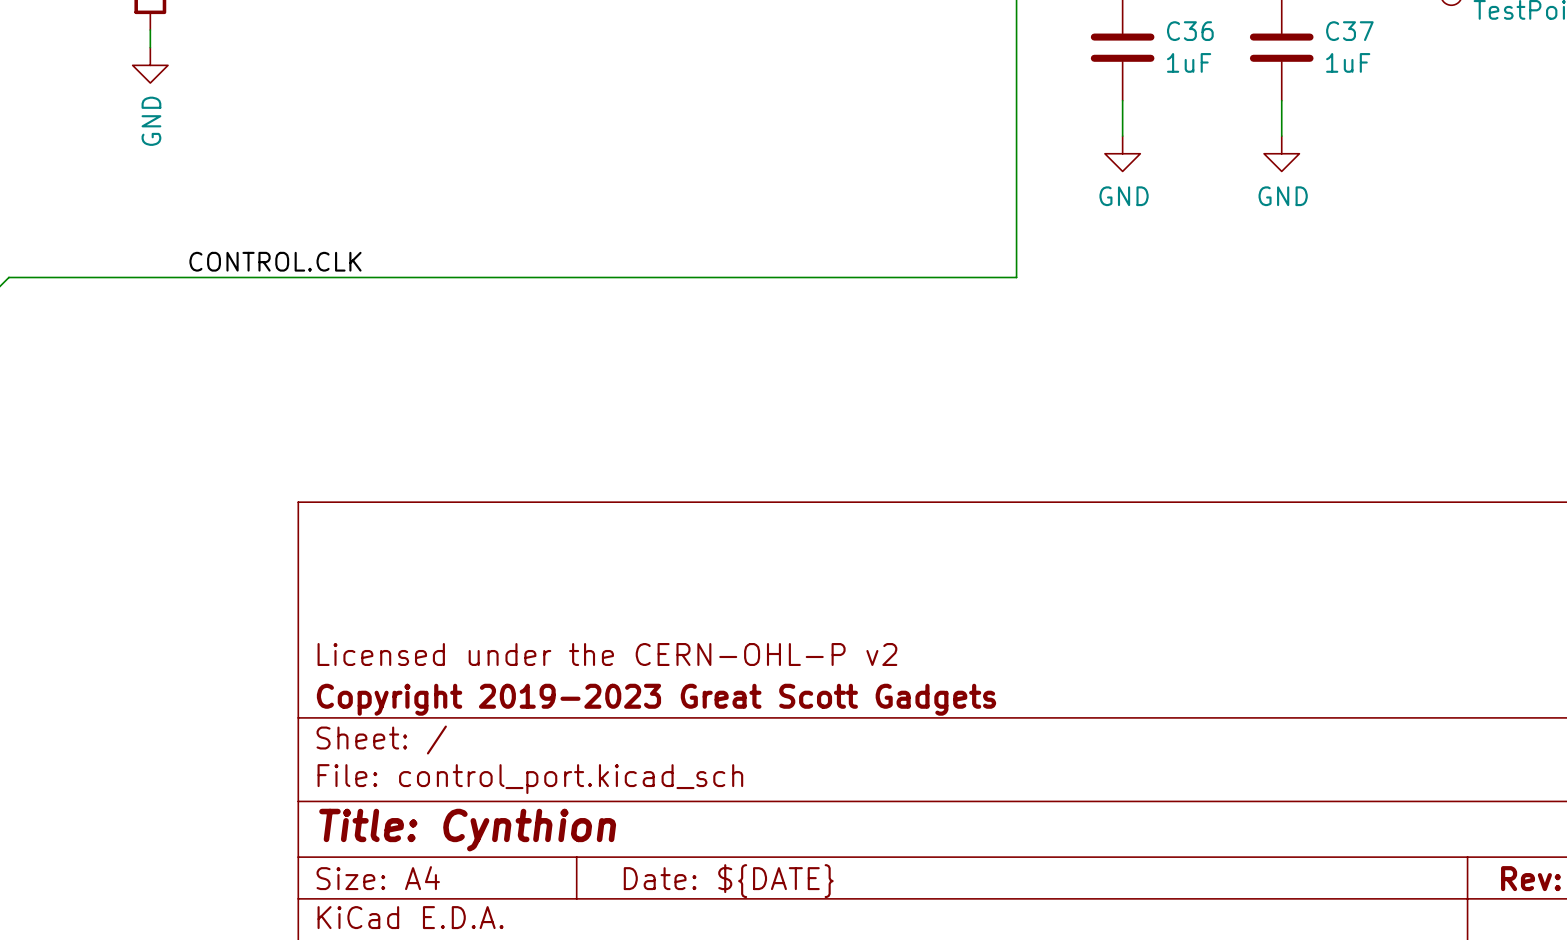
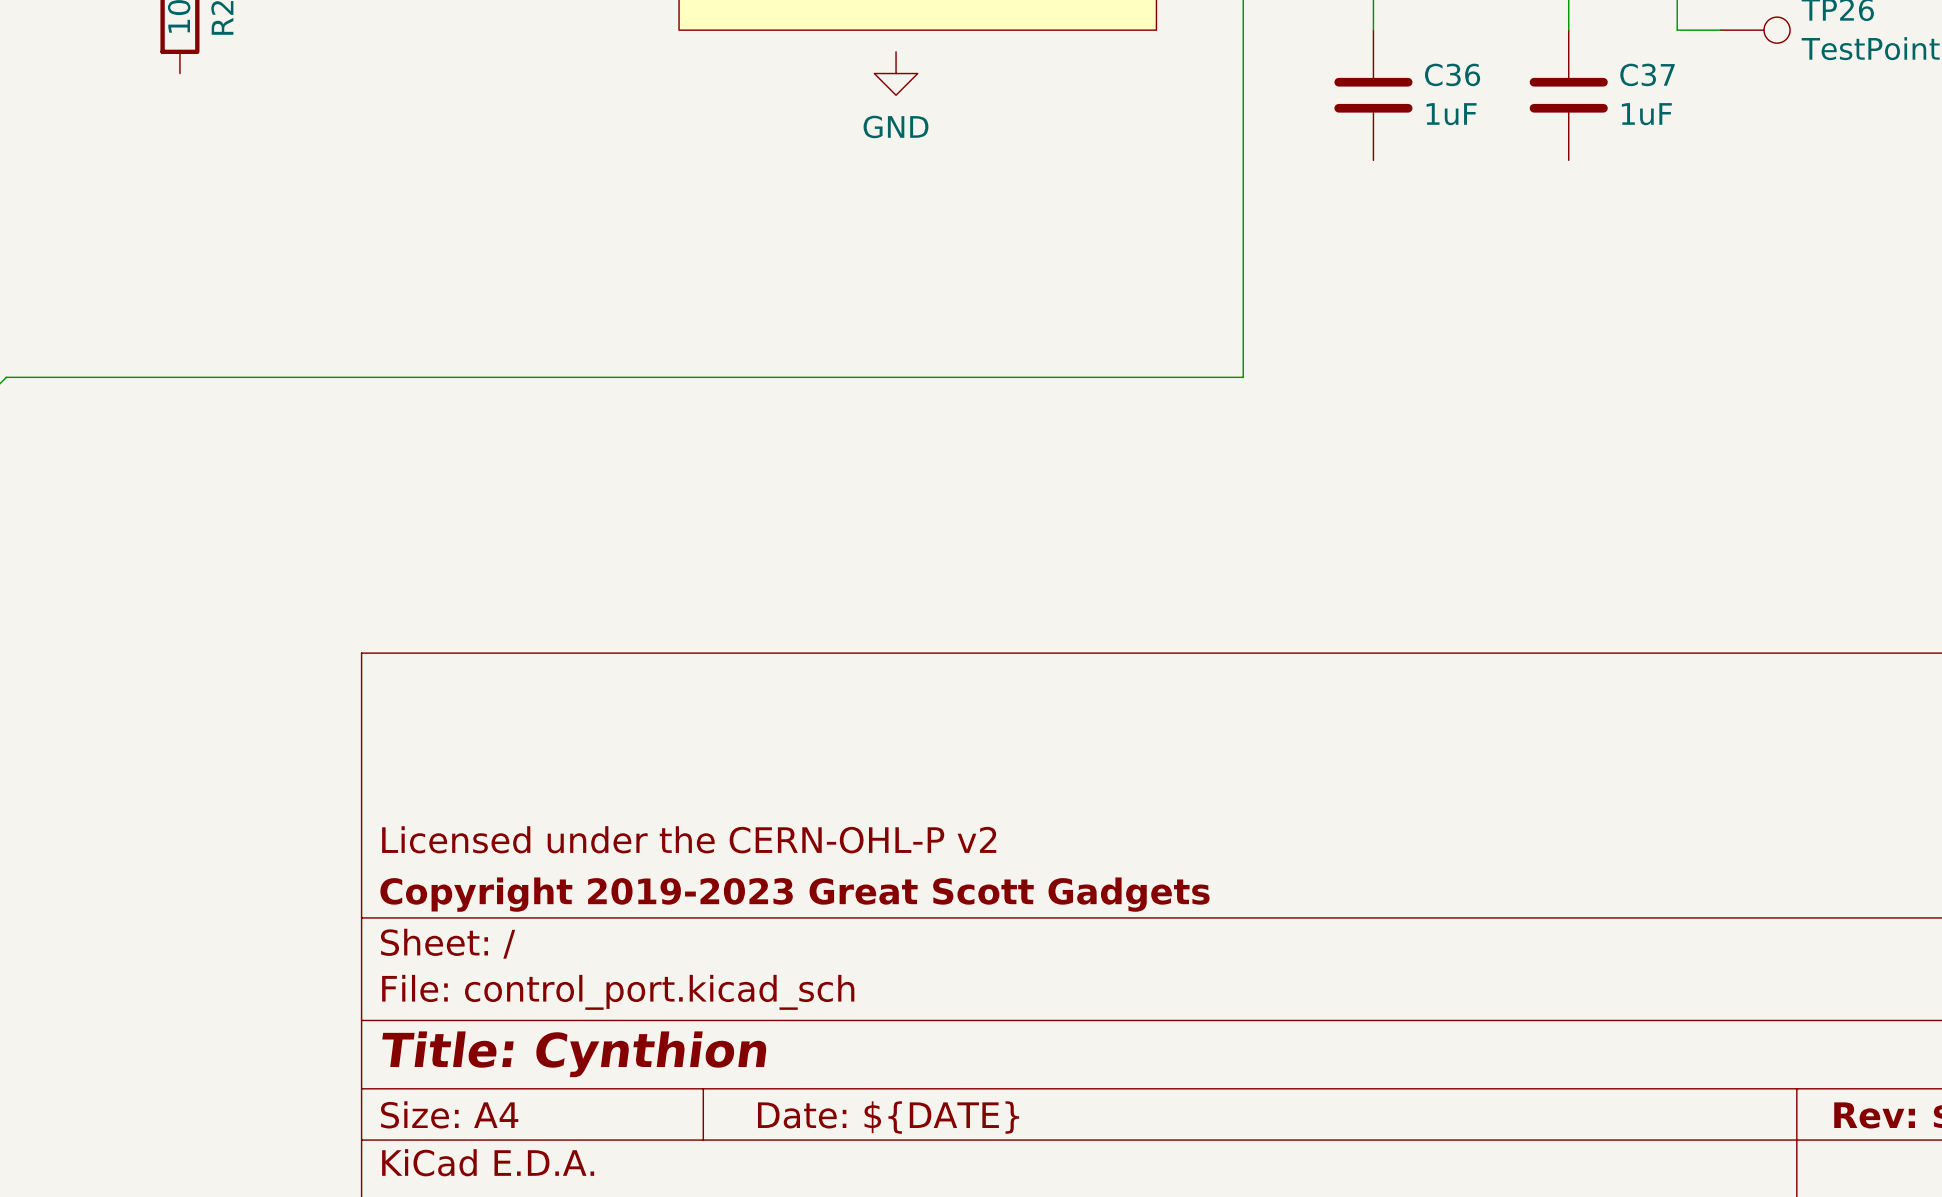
wire: (150, 30) (150, 47) -> none
power symbol: none -> GND (896, 73)
power symbol: GND (150, 65) -> none
wire: (1122, 100) (1122, 136) -> none
wire: (1281, 100) (1281, 136) -> none
power symbol: GND (1122, 153) -> none
power symbol: GND (1281, 153) -> none
label: CONTROL.CLK (275, 261) -> none

